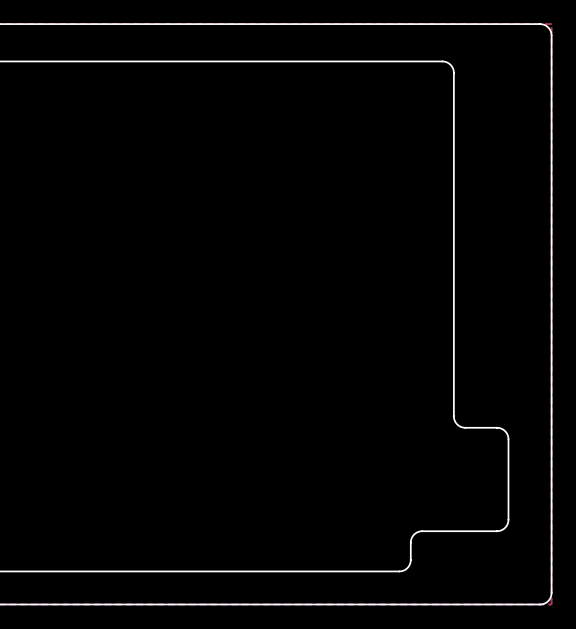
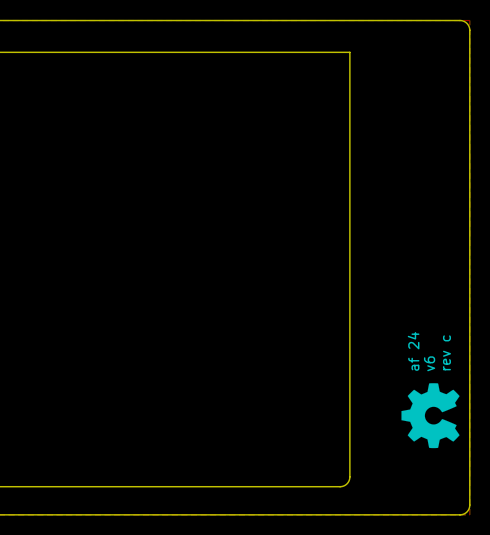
board edge: (410, 61) (444, 61) (450, 64) (453, 71) (454, 418) (457, 424) (462, 427) (500, 428) (505, 432) (508, 439) (508, 519) (505, 527) (496, 531) (421, 531) (413, 535) (410, 542) -> (349, 52) (349, 462)
text: none -> af 24 (413, 351)
text: none -> rev c (446, 352)
text: none -> v6 (429, 363)
drawing: none -> [401, 383, 460, 449]

